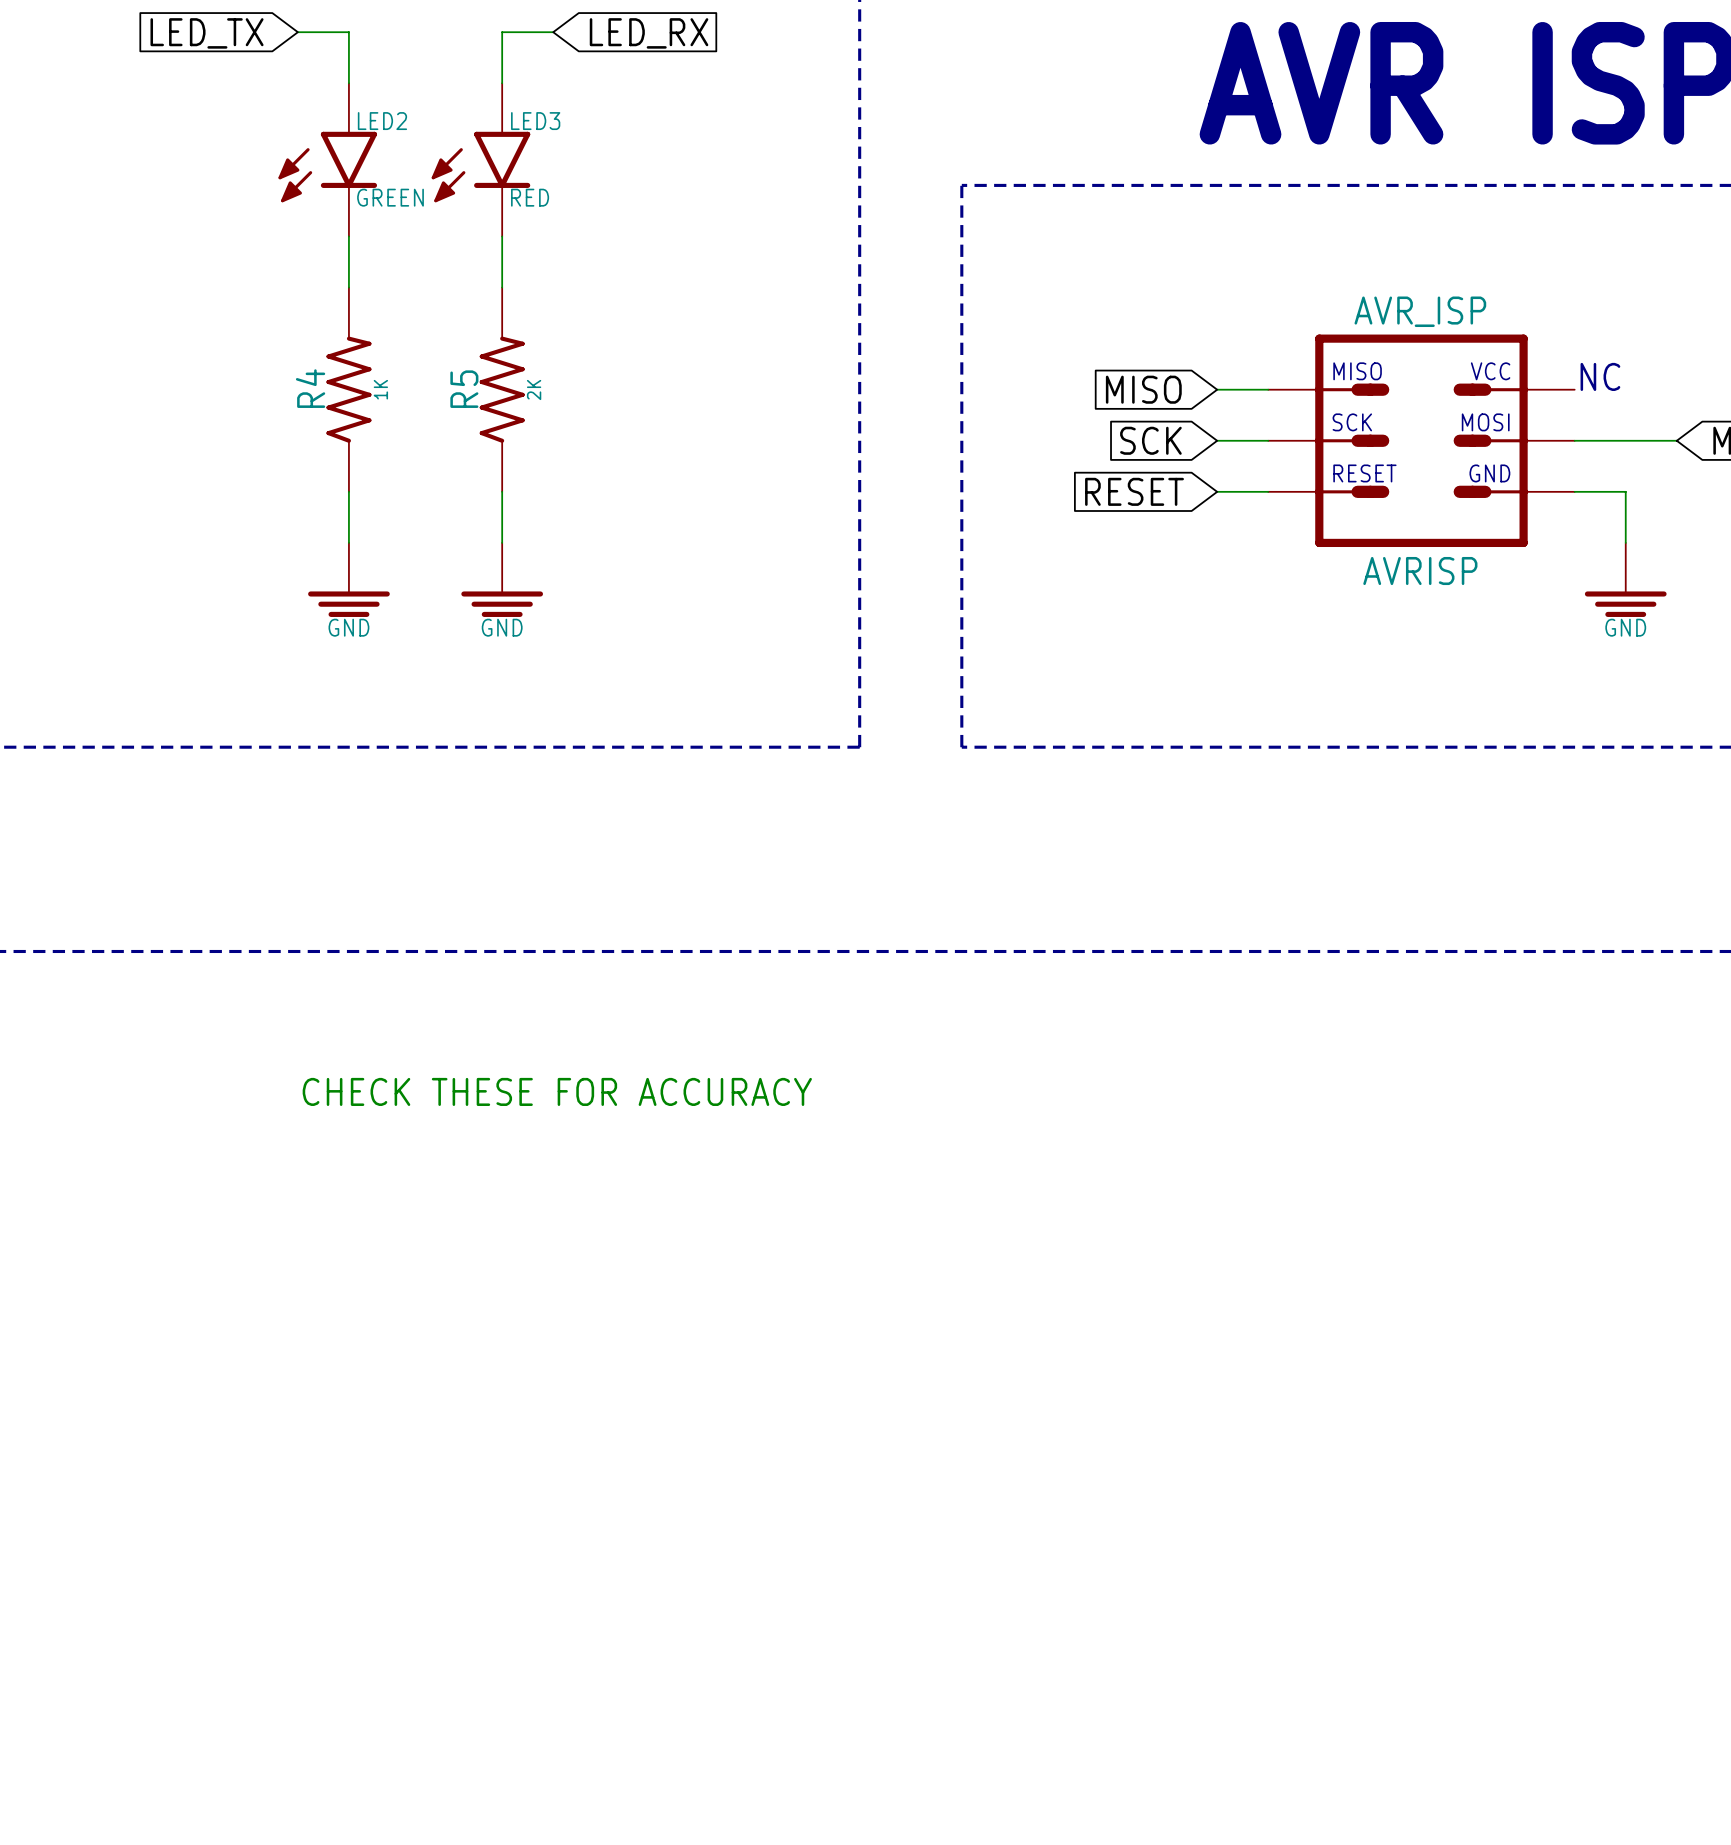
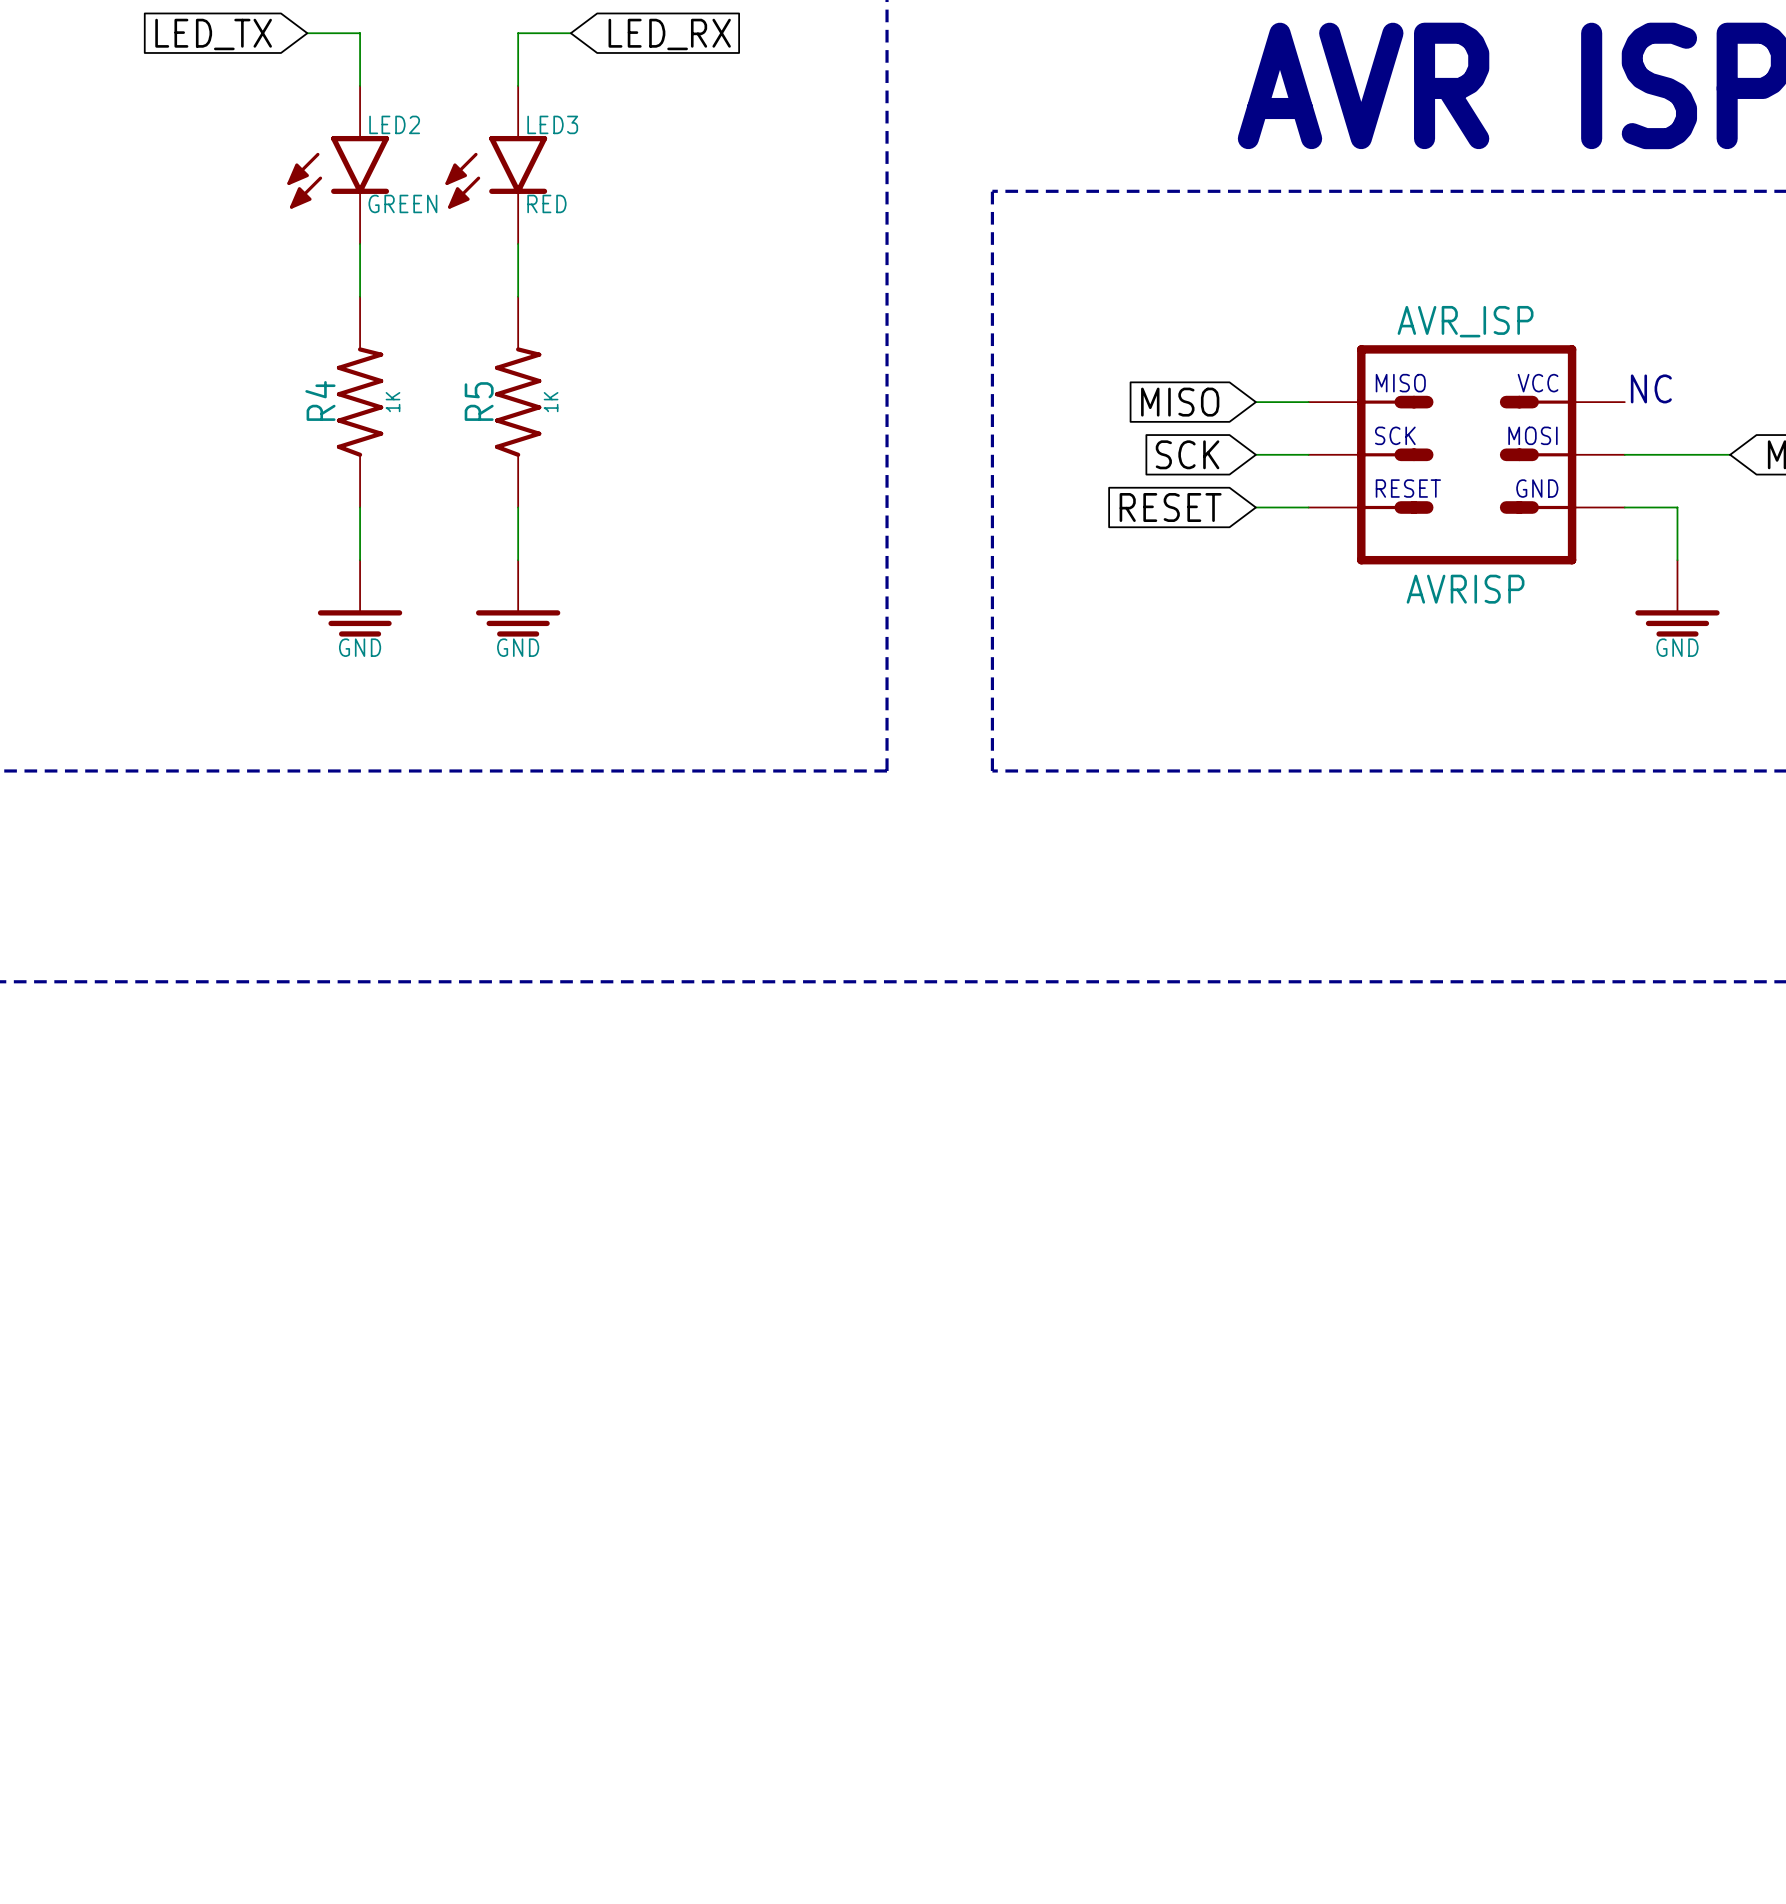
R5 value: 2K (534, 389) -> 1K (551, 402)
text: CHECK THESE FOR ACCURACY (557, 1091) -> none

